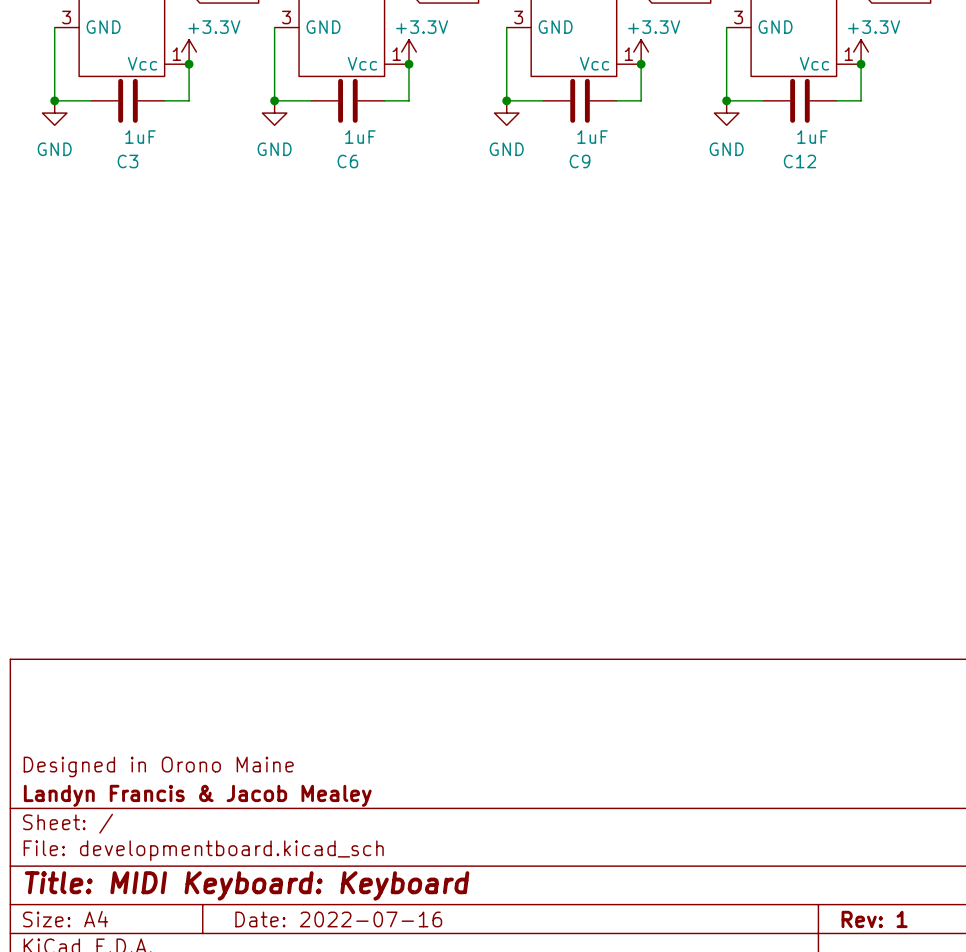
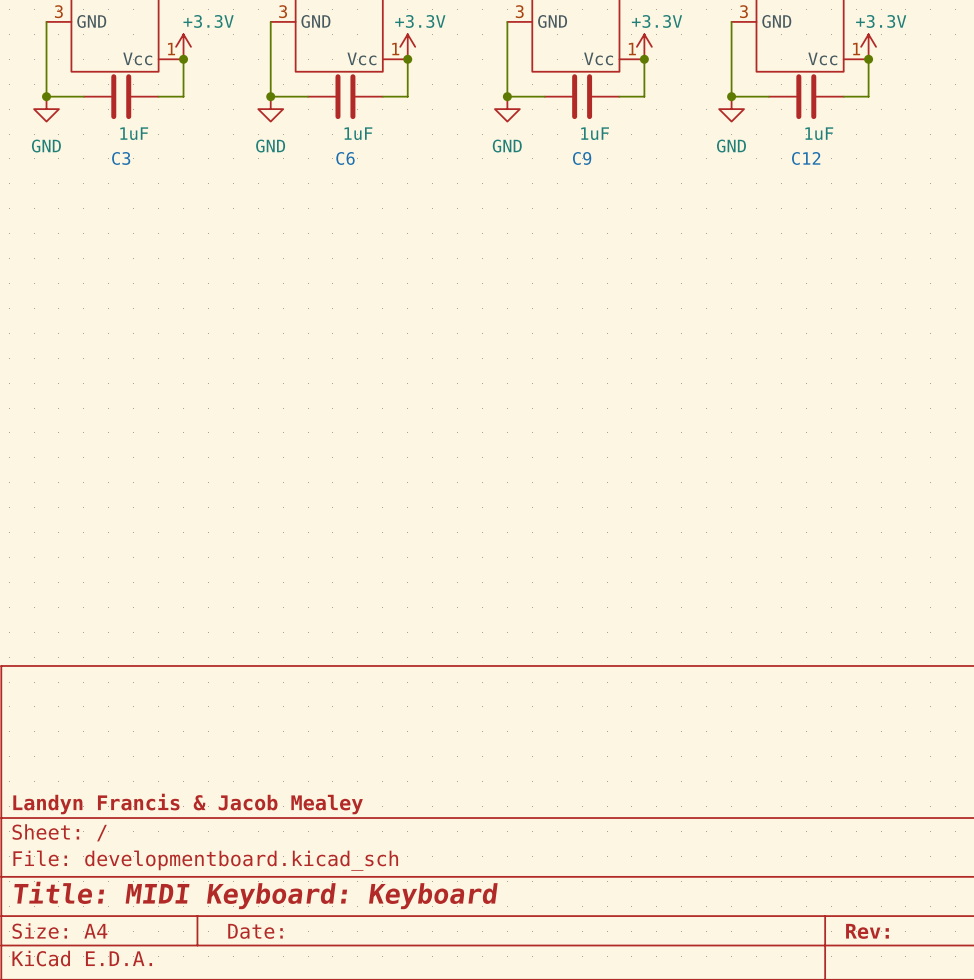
title block: Designed in Orono Maine (158, 766) -> none
title block: Date: 2022-07-16 (338, 919) -> Date: (255, 931)
title block: Rev: 1 (874, 919) -> Rev: (867, 931)

